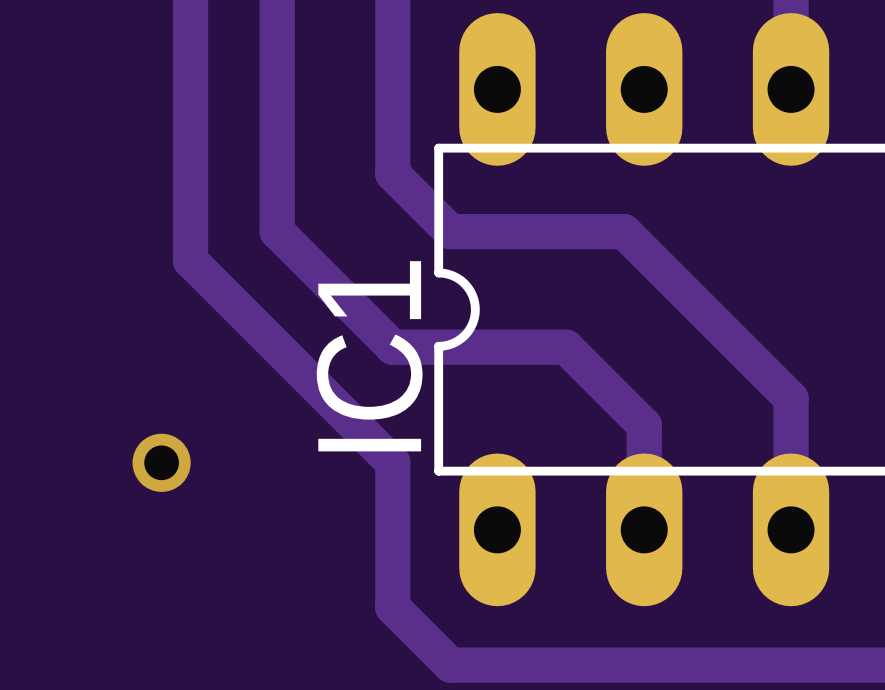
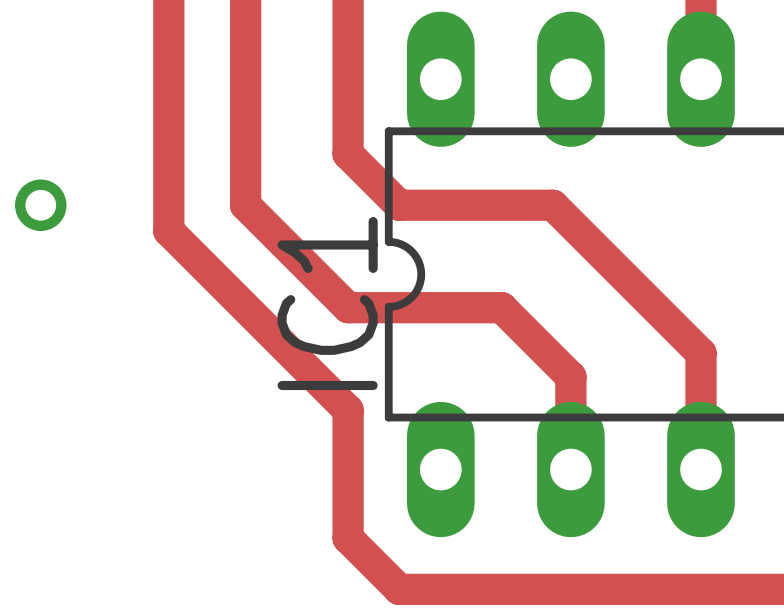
via: none -> (40, 205)
via: (161, 462) -> none

